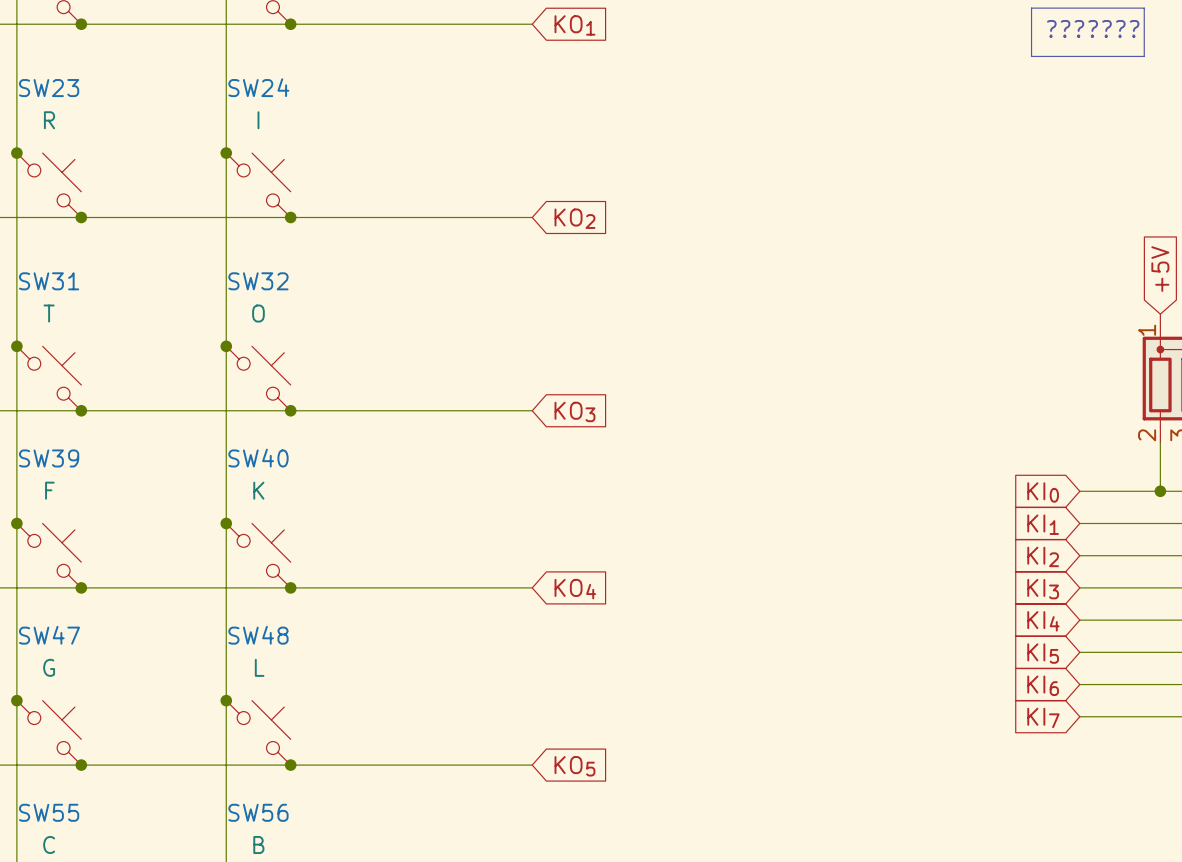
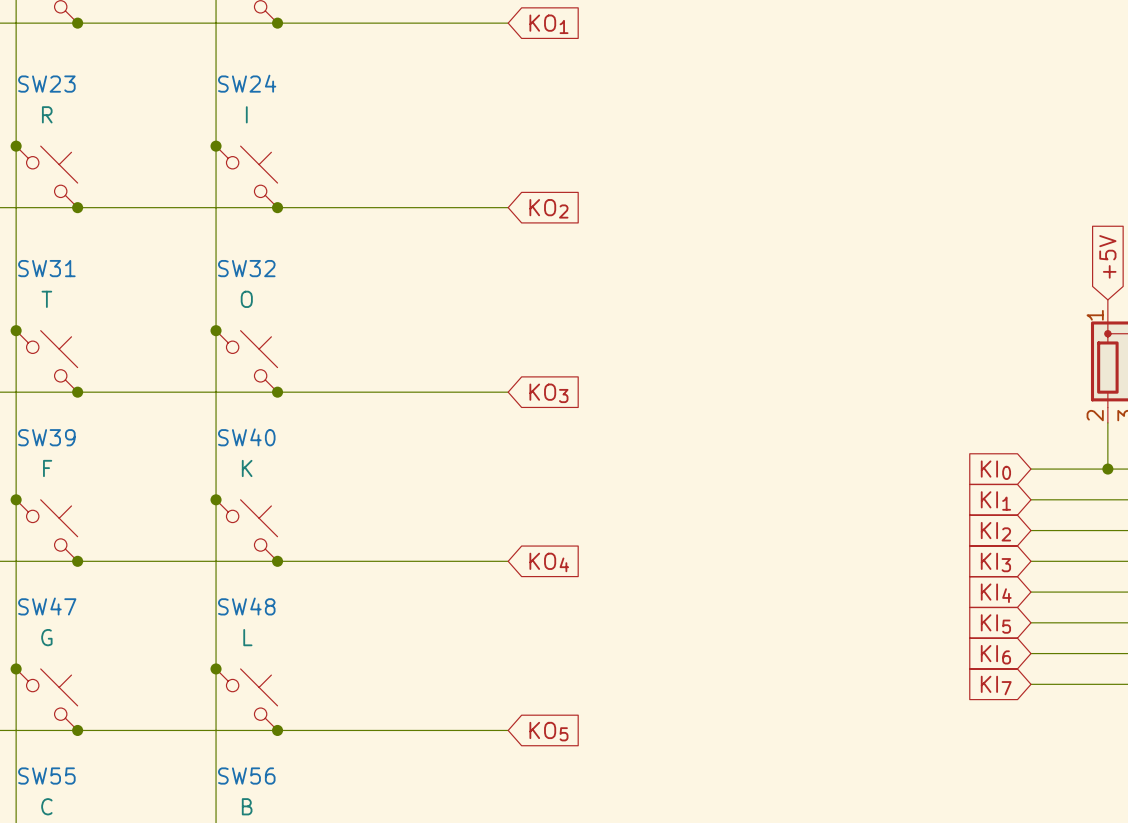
line: (1031, 8) (1144, 8) (1144, 56) (1031, 56) (1031, 8) -> none
text: ??????? (1093, 29) -> none

